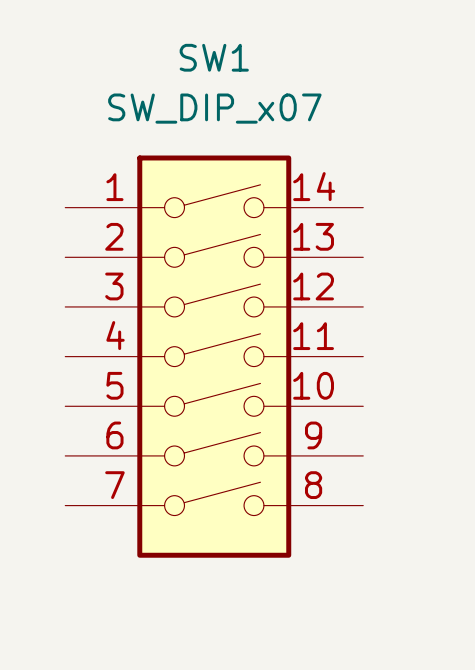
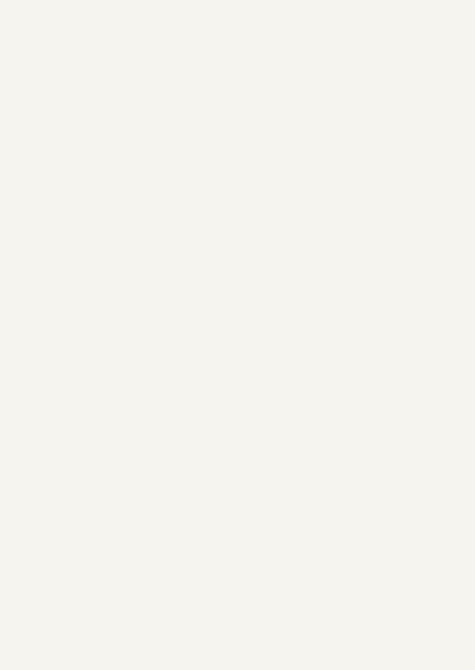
SW1: SW_DIP_x07 (214, 356) -> none

